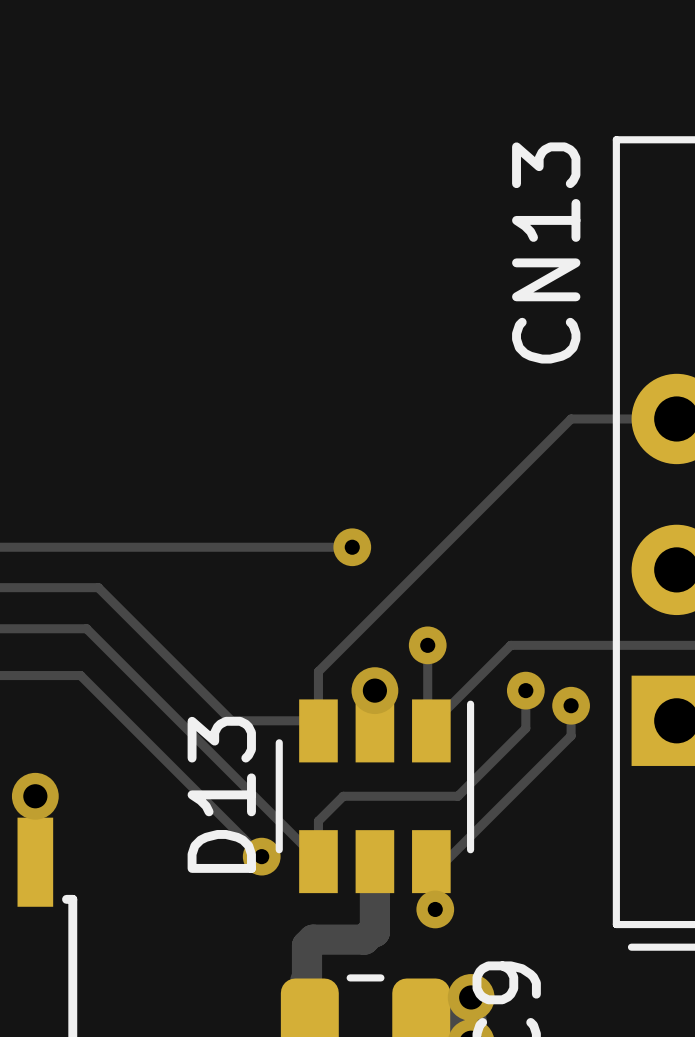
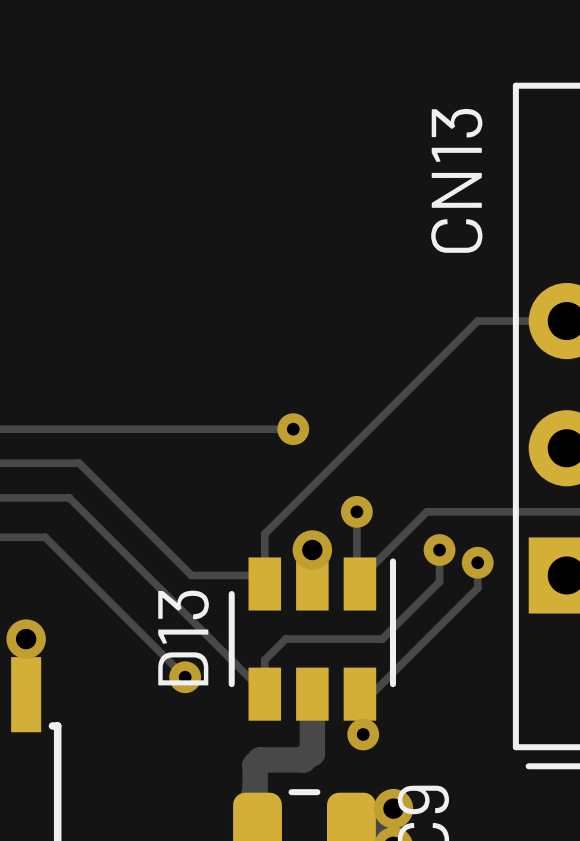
track: (57, 675) (80, 675) (261, 856) -> (45, 537) (185, 677)
via position: (261, 856) -> (185, 677)

